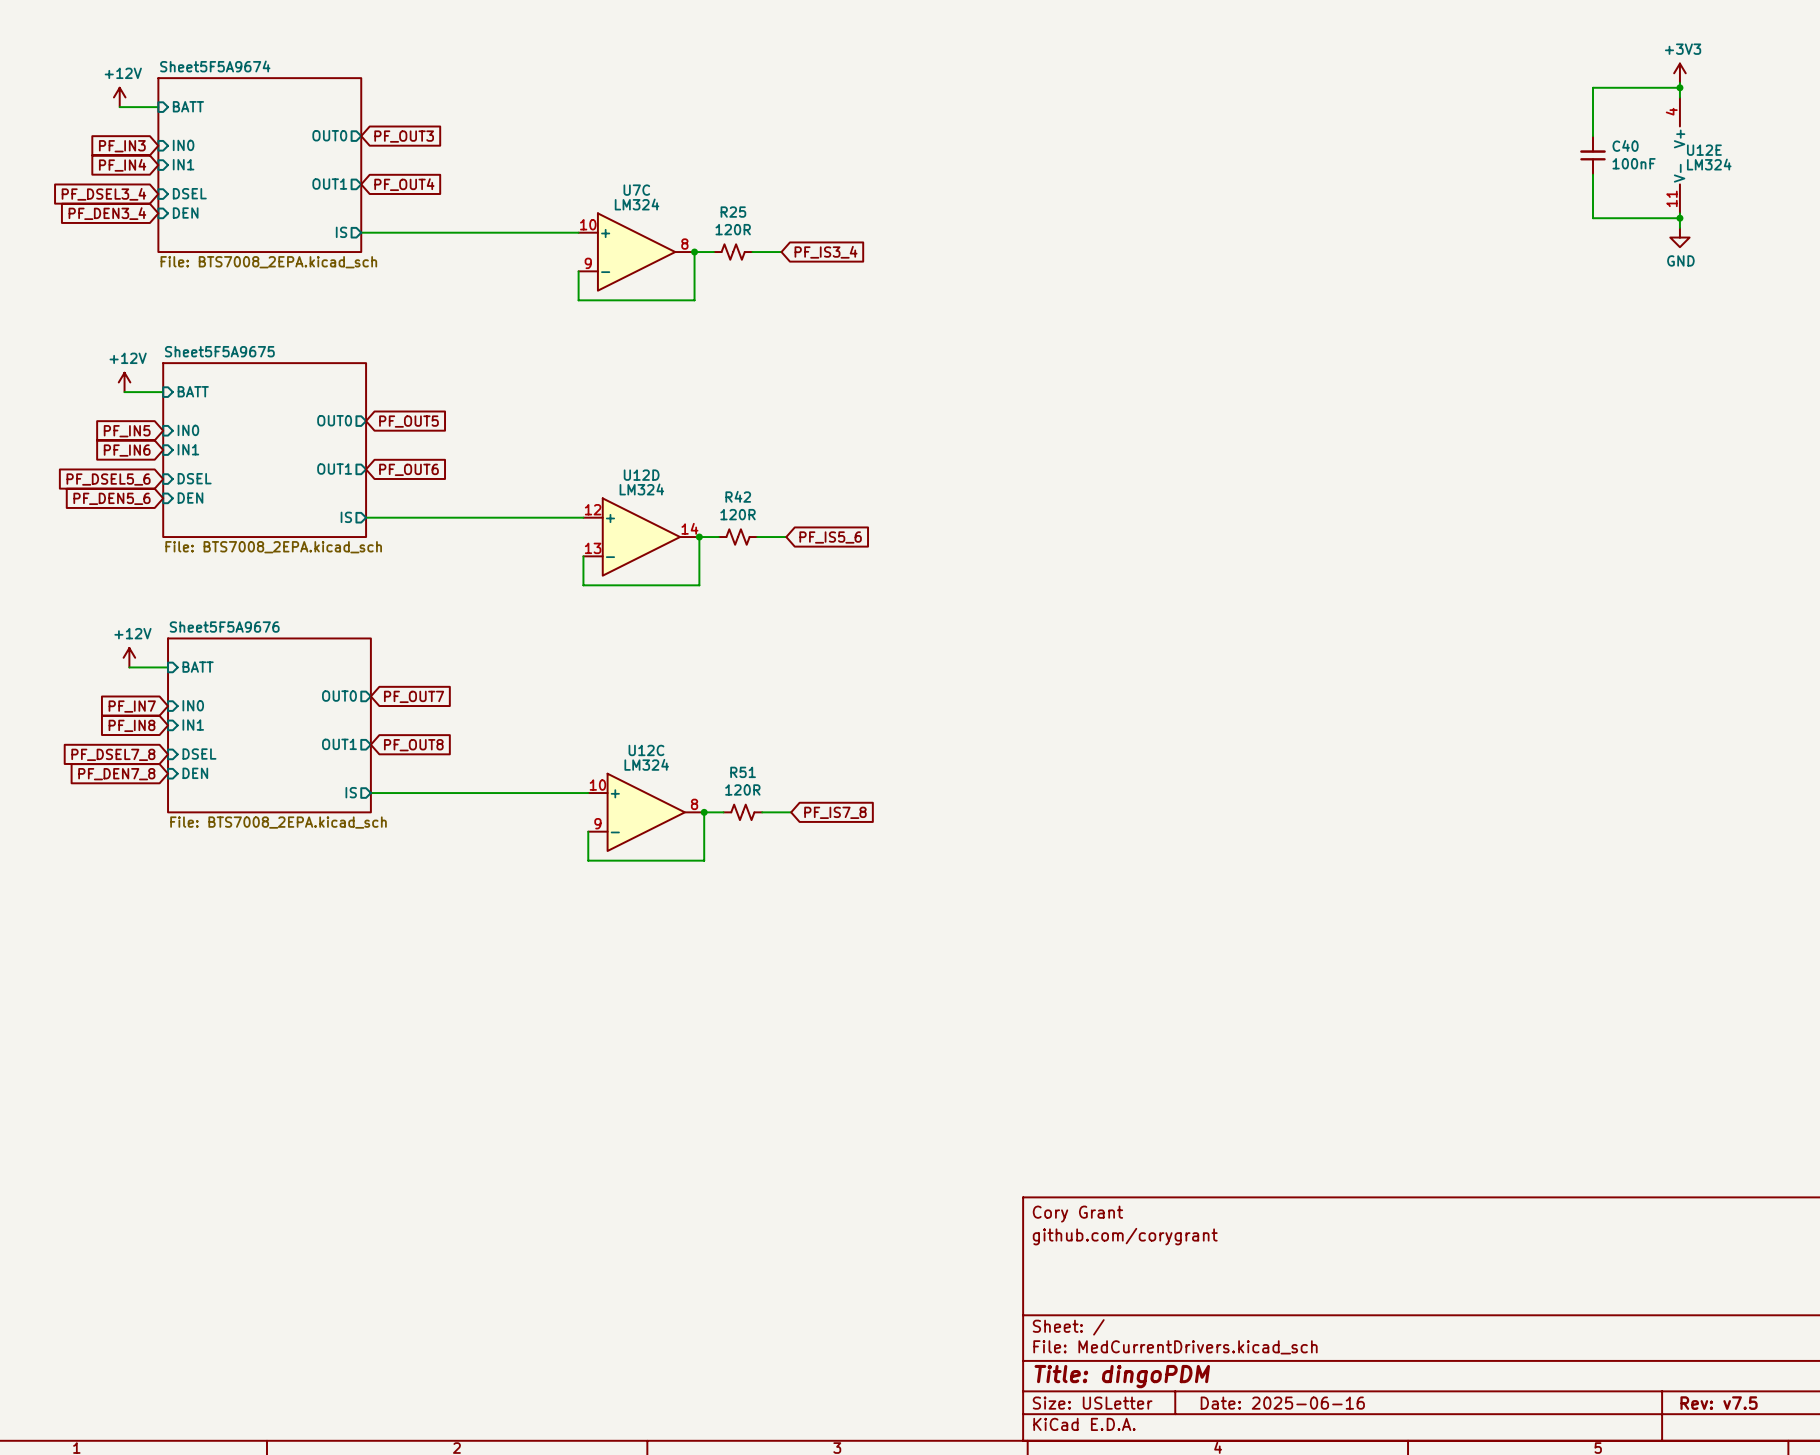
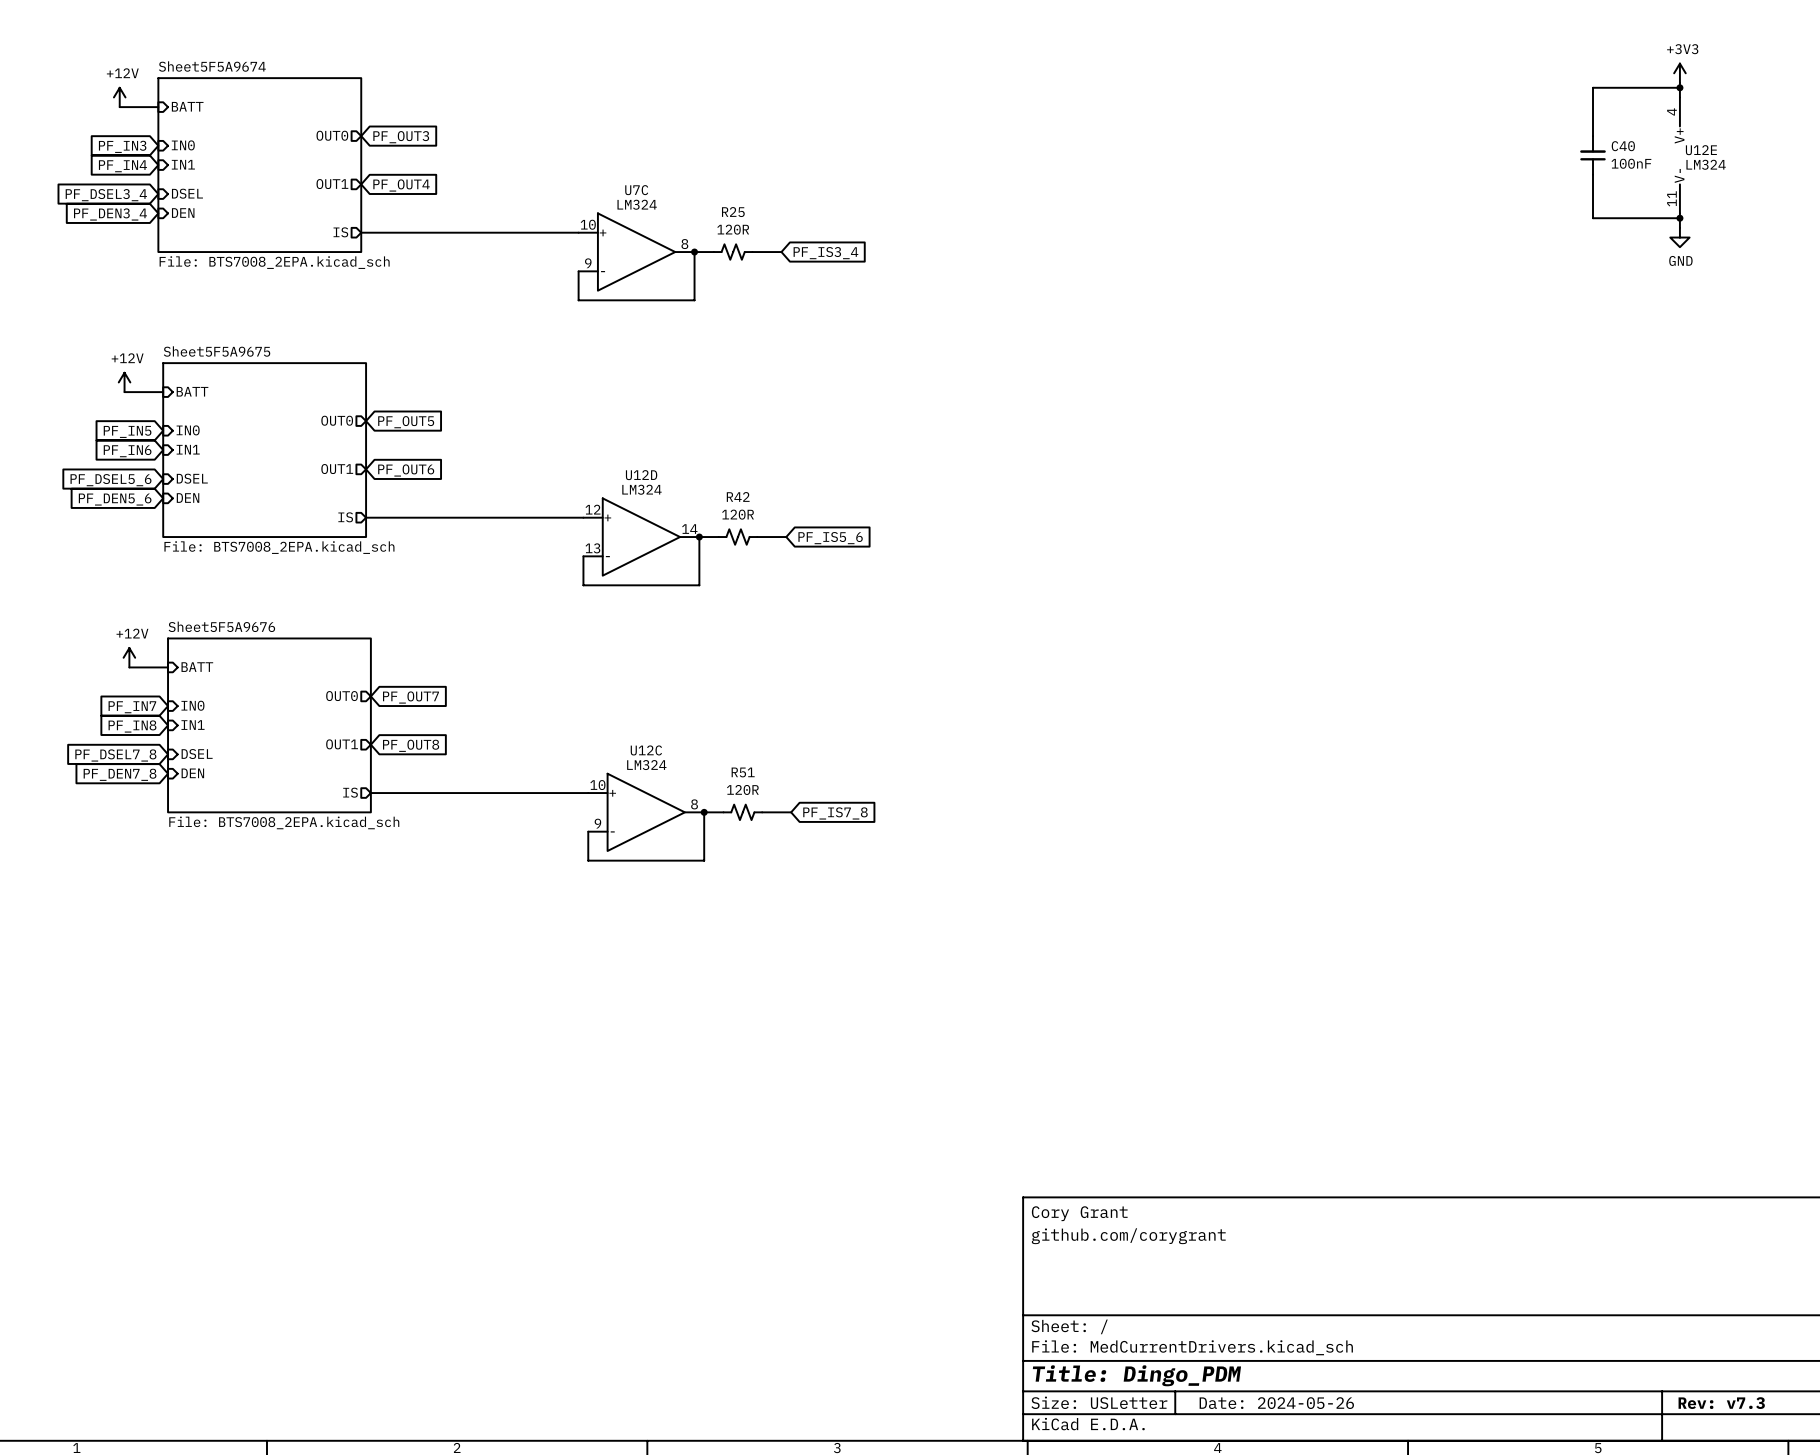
title block: Title: dingoPDM (1122, 1376) -> Title: Dingo_PDM (1136, 1375)
title block: Date: 2025-06-16 (1282, 1403) -> Date: 2024-05-26 (1276, 1403)
title block: Rev: v7.5 (1719, 1403) -> Rev: v7.3 (1721, 1403)

